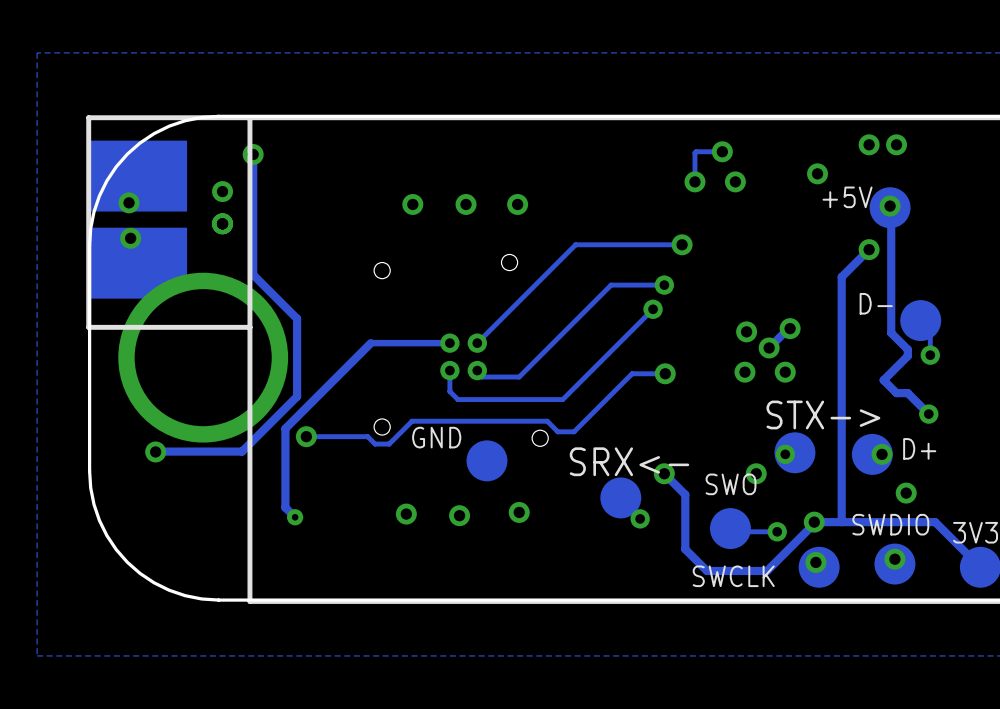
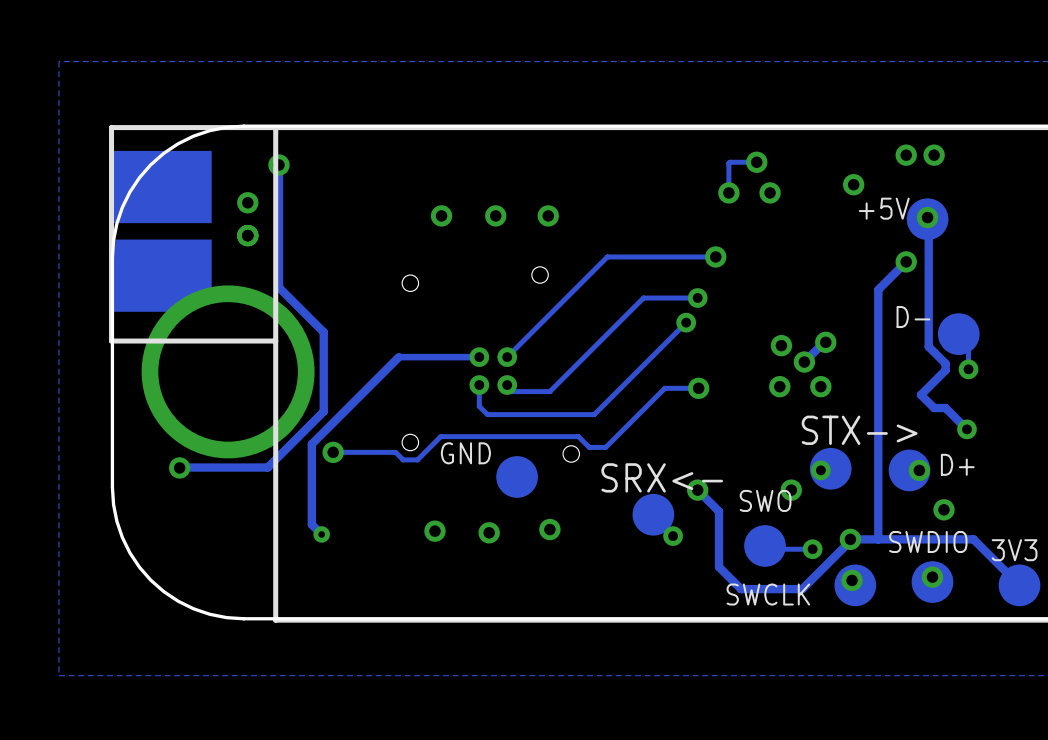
via: (129, 202) -> none
via: (130, 238) -> none

